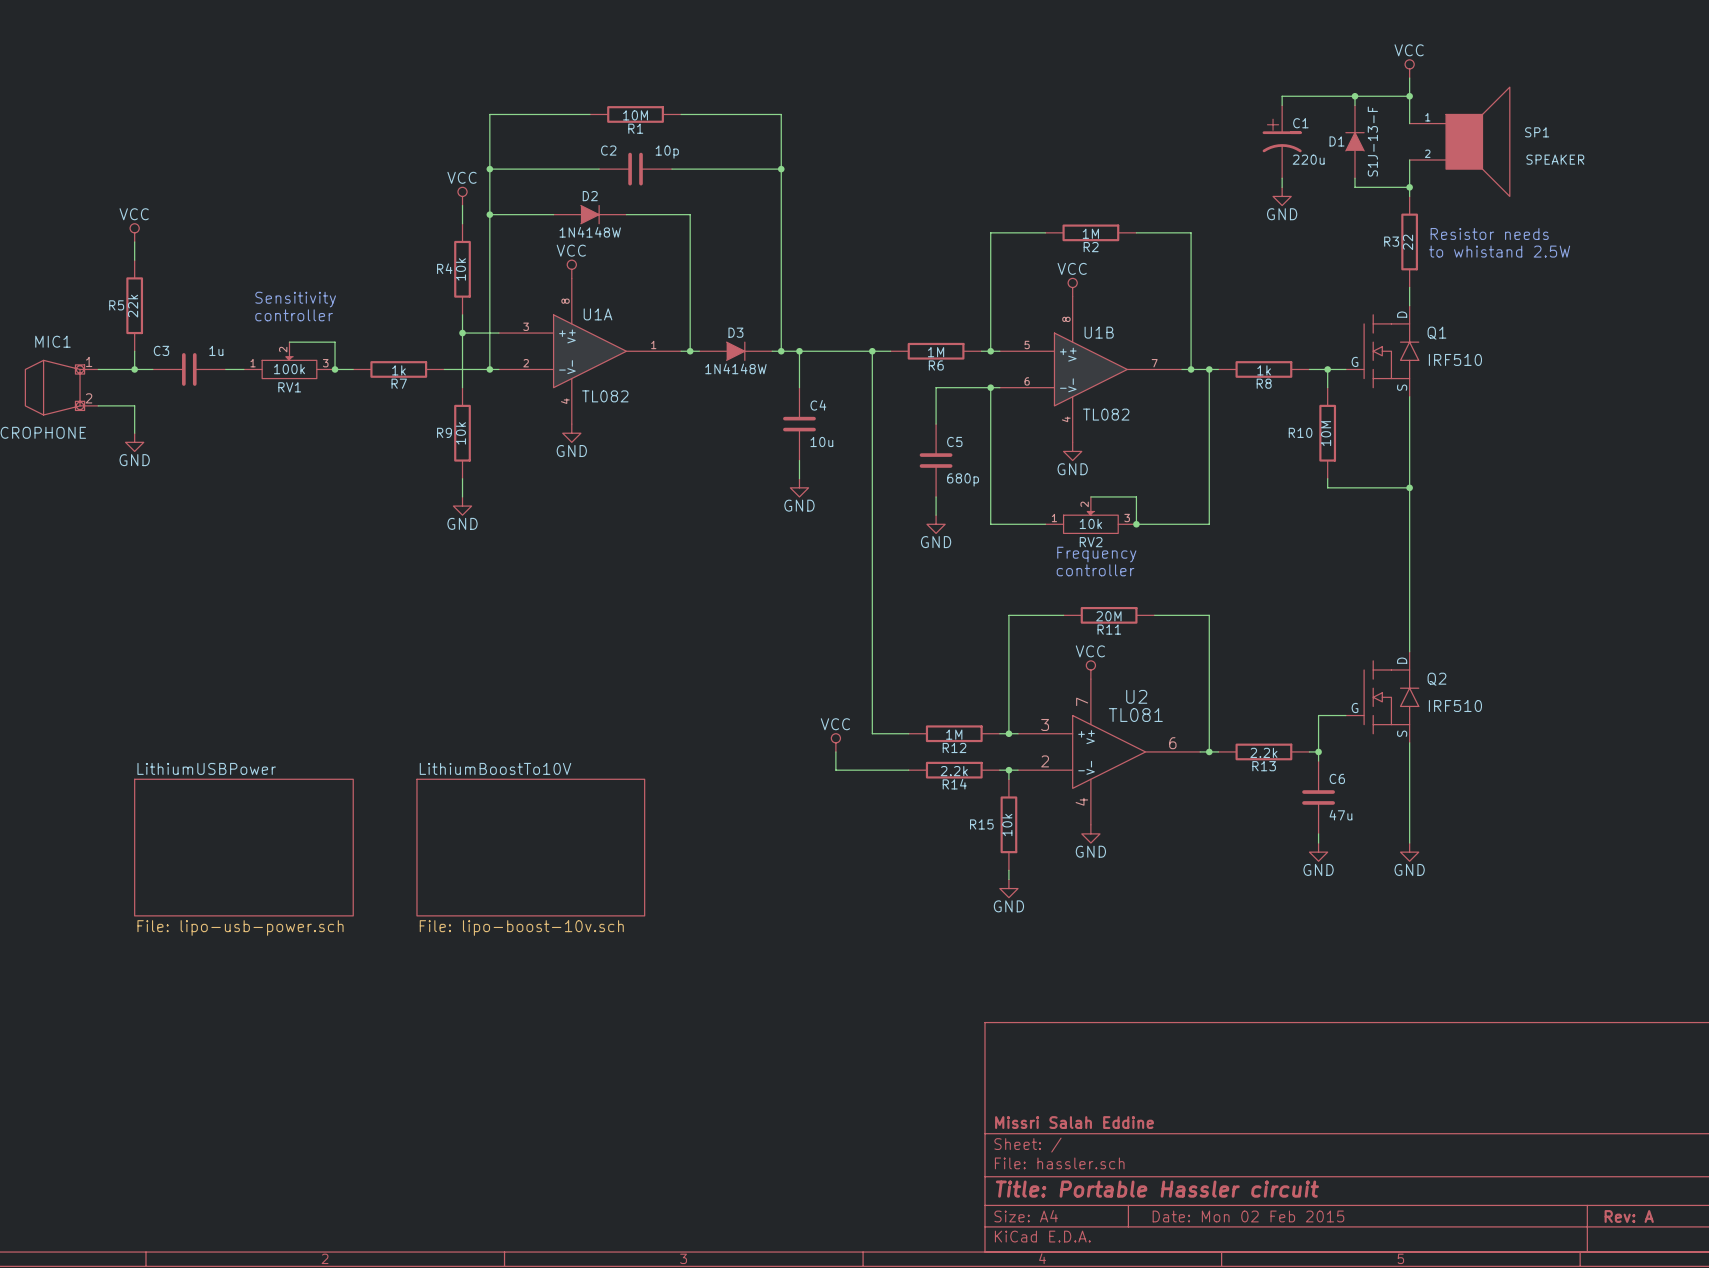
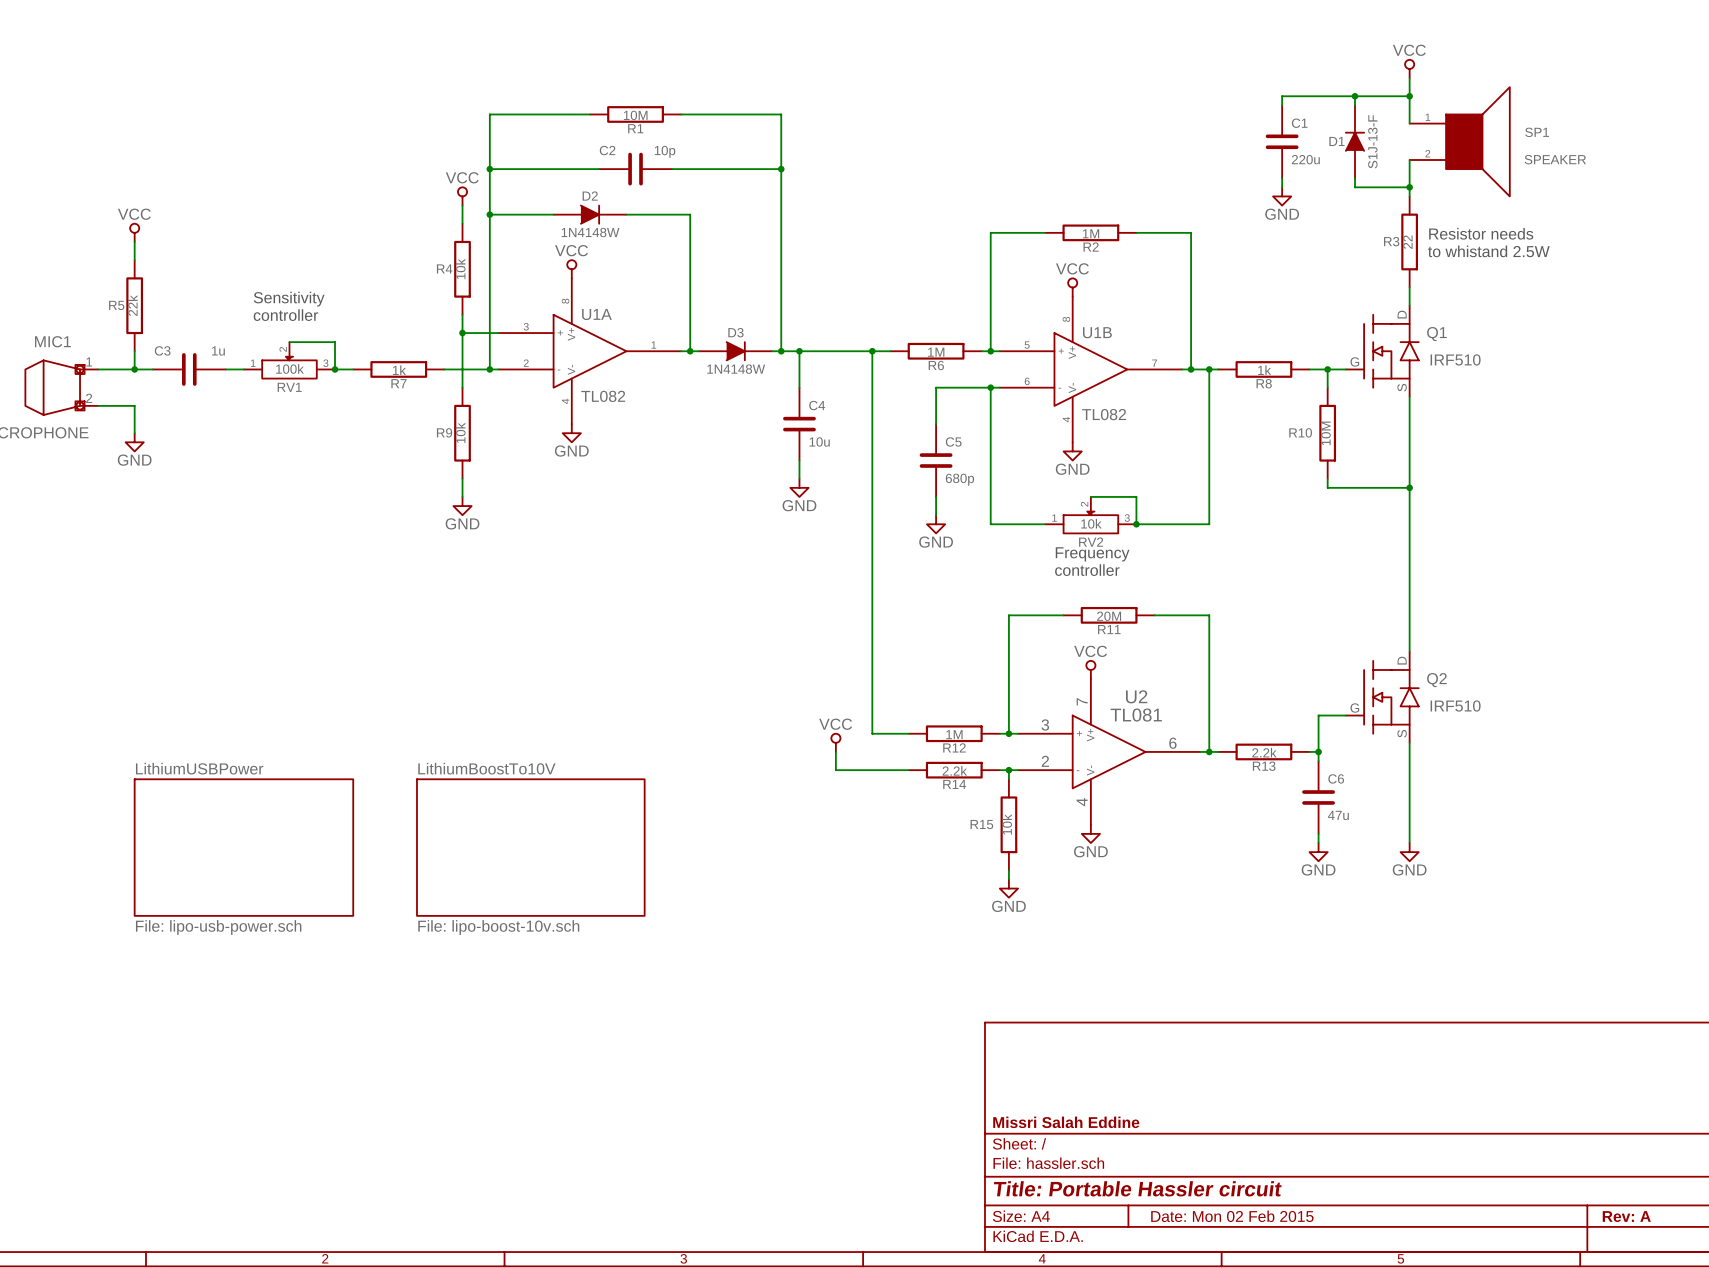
C1 symbol: [1262, 105, 1302, 179] -> [1265, 105, 1299, 179]

